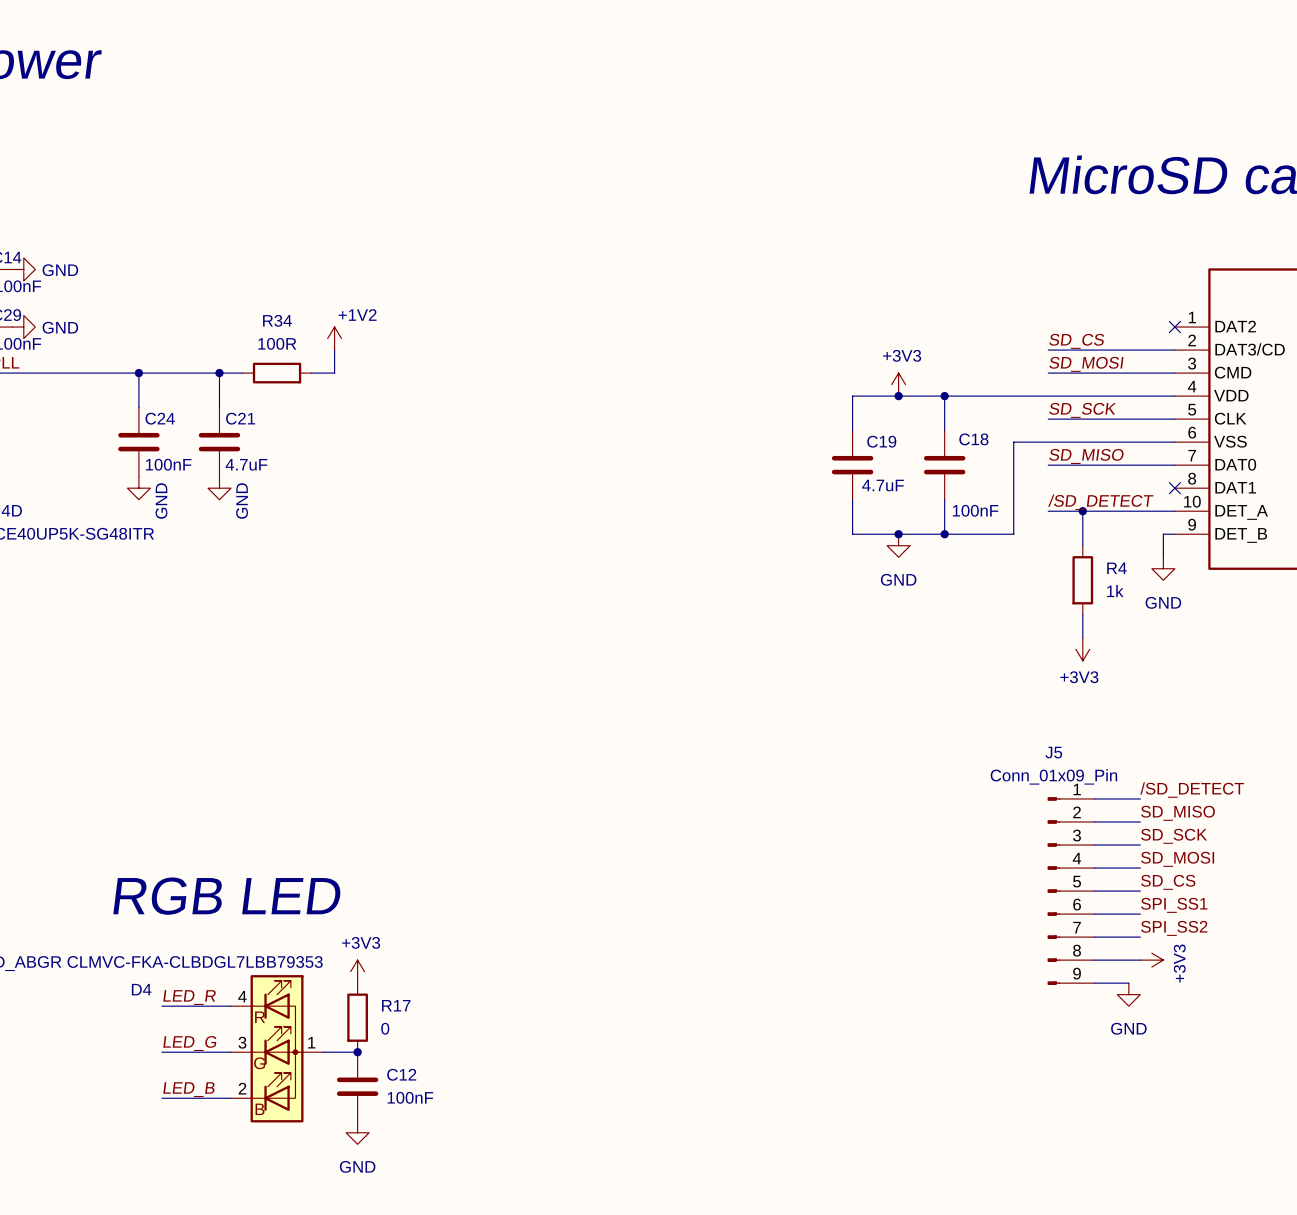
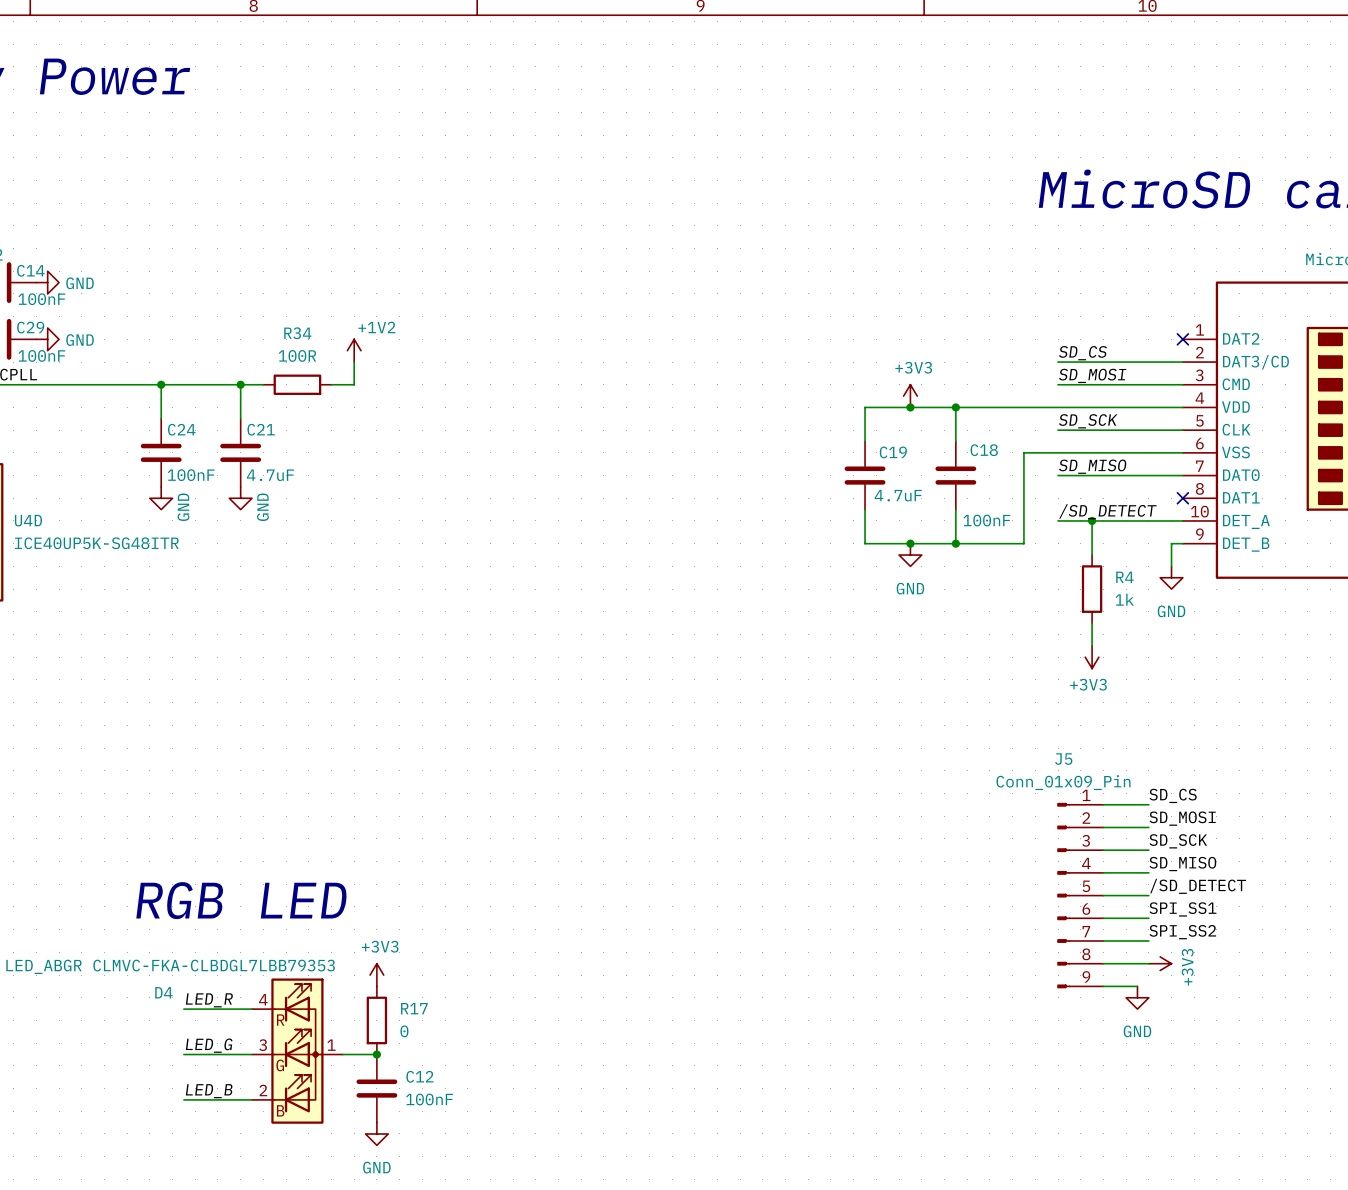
label: /SD_DETECT (1192, 790) -> SD_CS (1173, 795)
label: SD_MISO (1177, 813) -> SD_MOSI (1182, 818)
label: SD_MOSI (1177, 859) -> SD_MISO (1182, 864)
label: SD_CS (1168, 882) -> /SD_DETECT (1198, 886)

